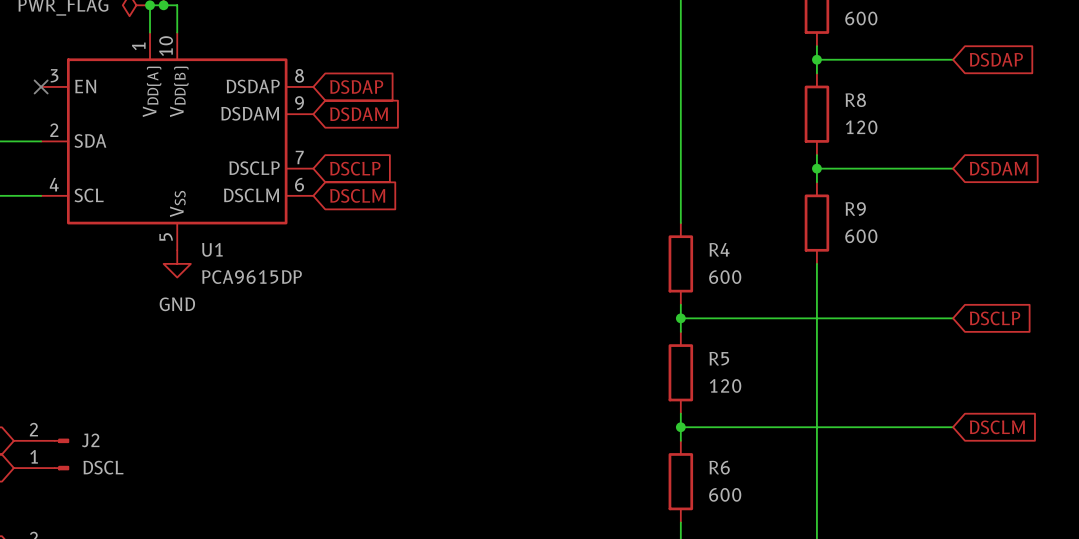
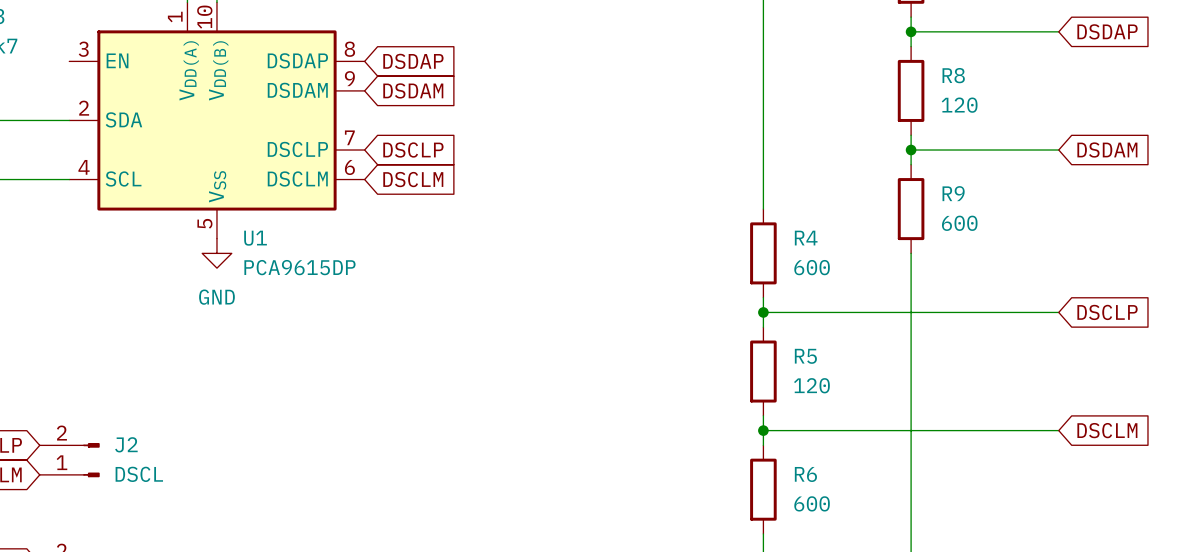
no-connect mark: (41, 86) -> none

